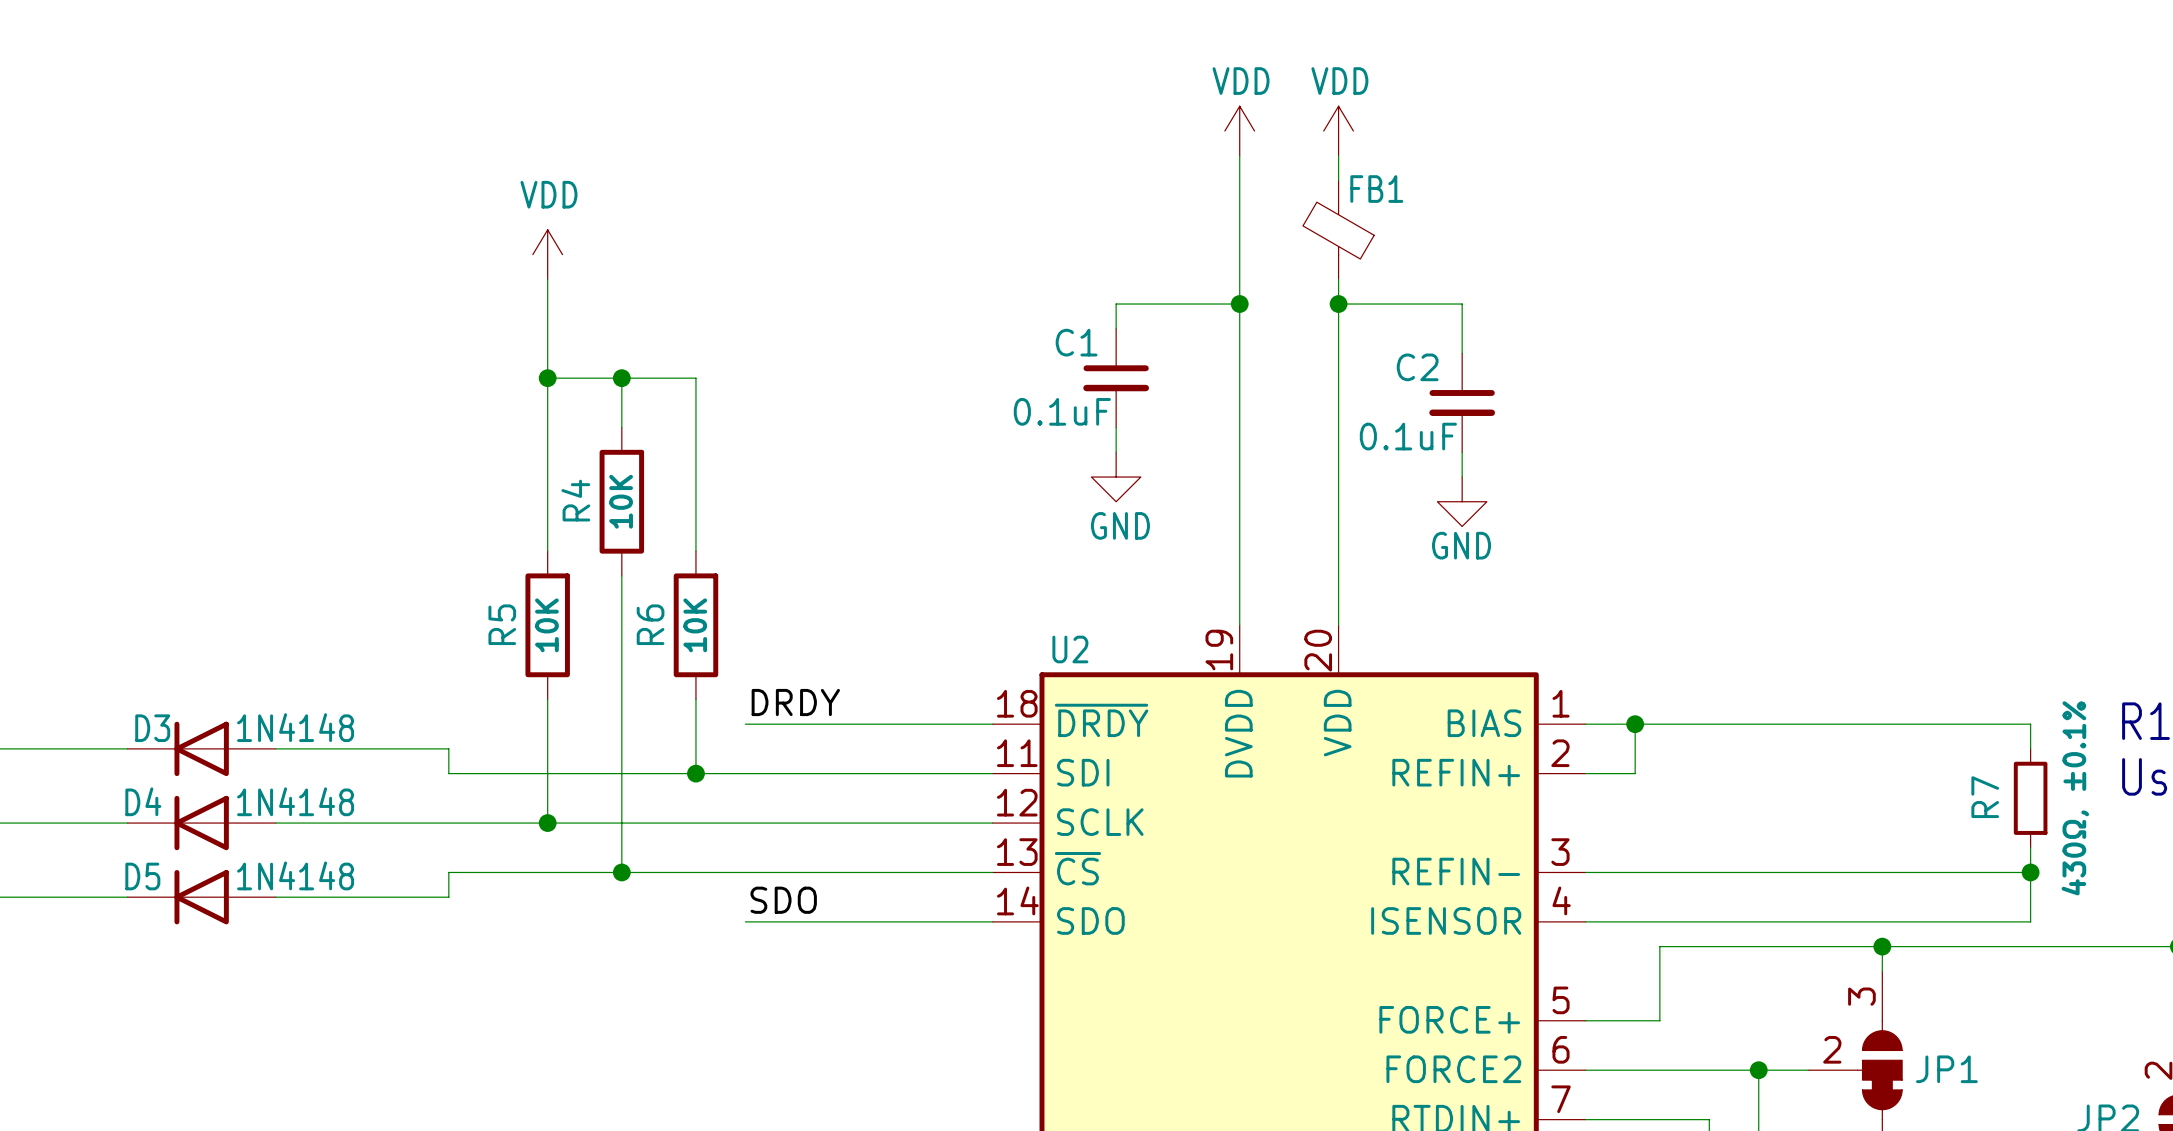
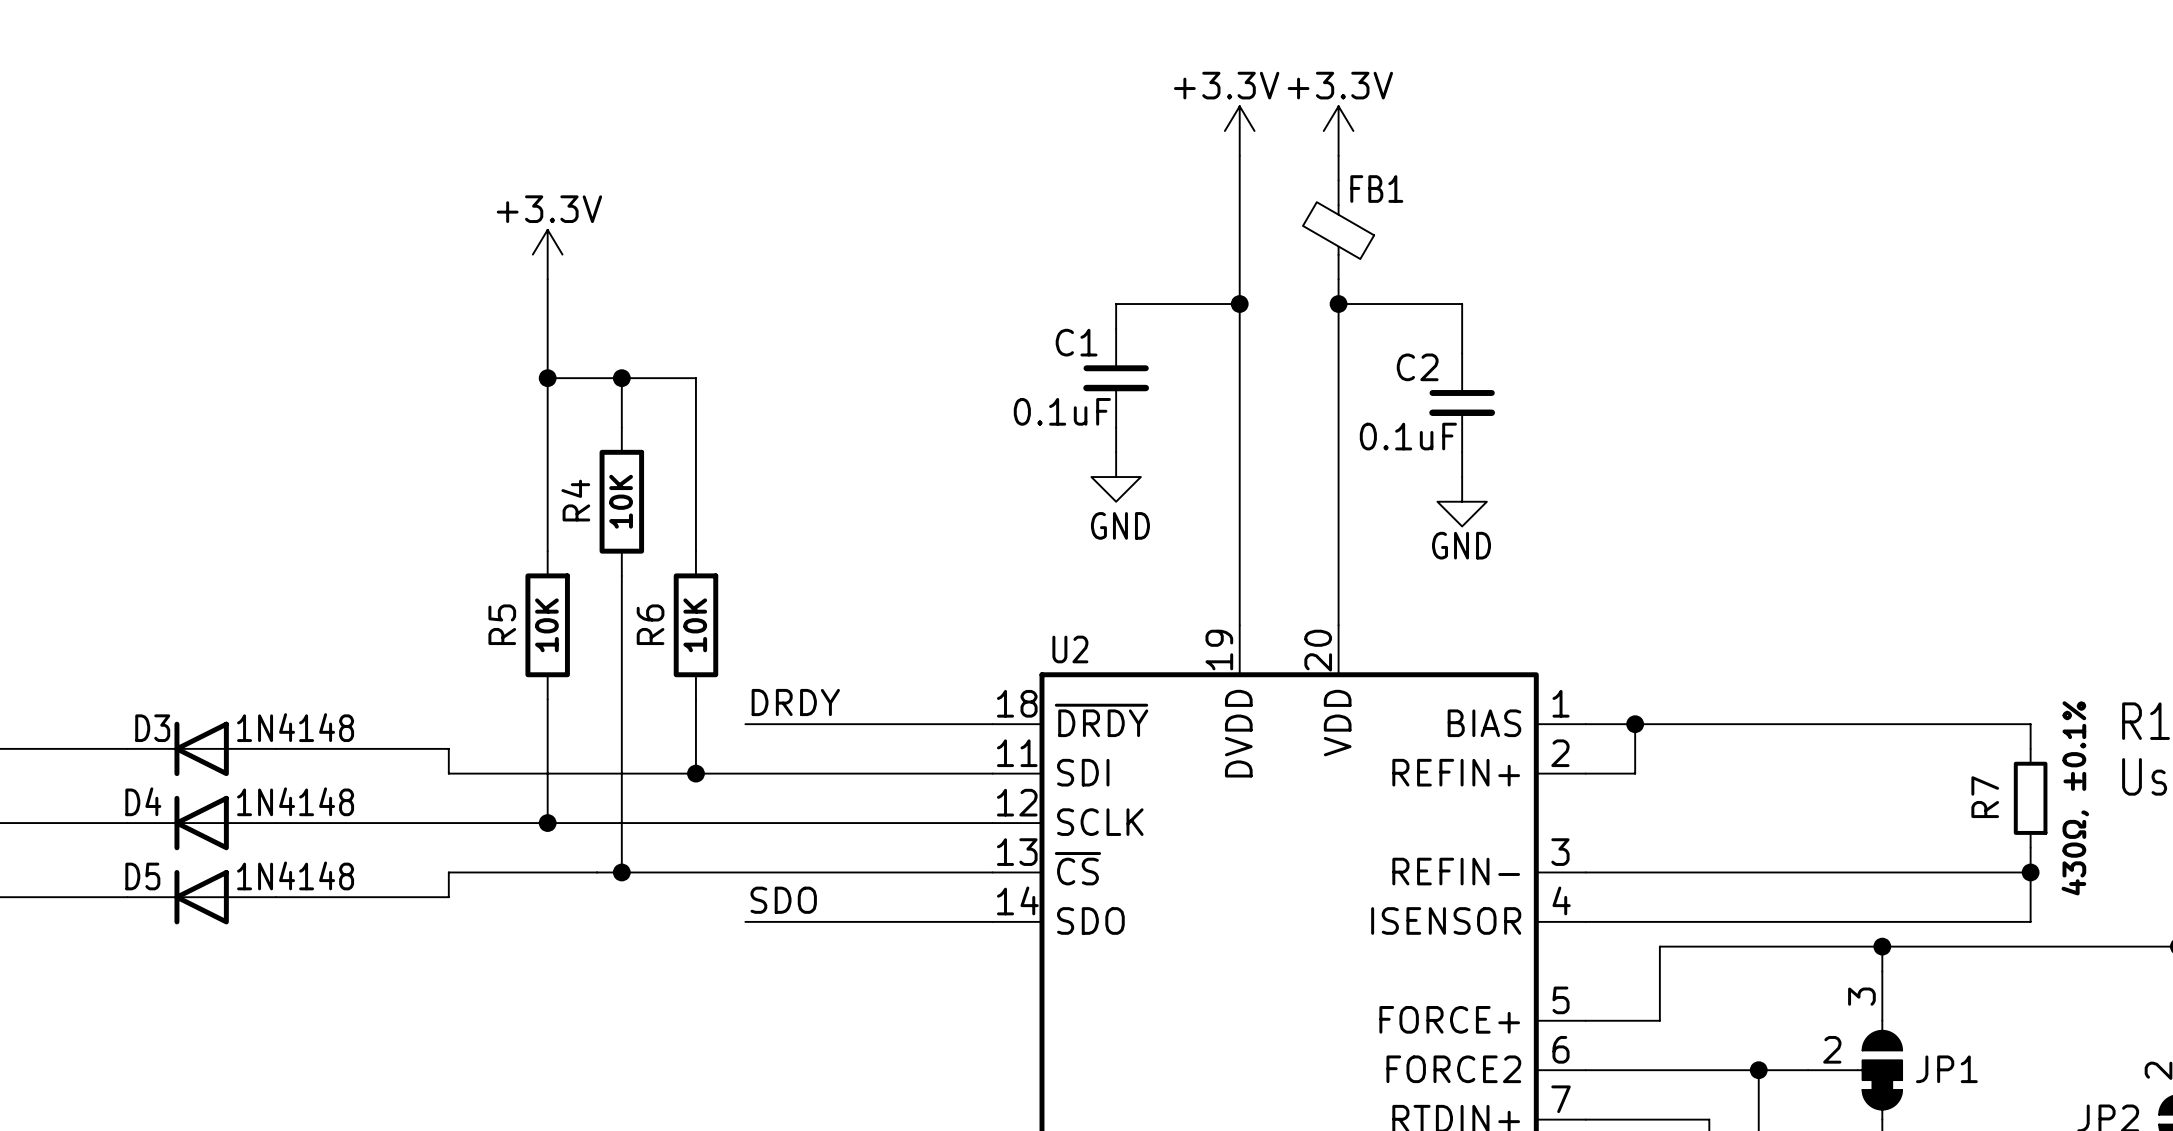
power symbol: VDD (1239, 131) -> +3.3V (1239, 131)
power symbol: VDD (1338, 131) -> +3.3V (1338, 131)
power symbol: VDD (547, 254) -> +3.3V (547, 254)

